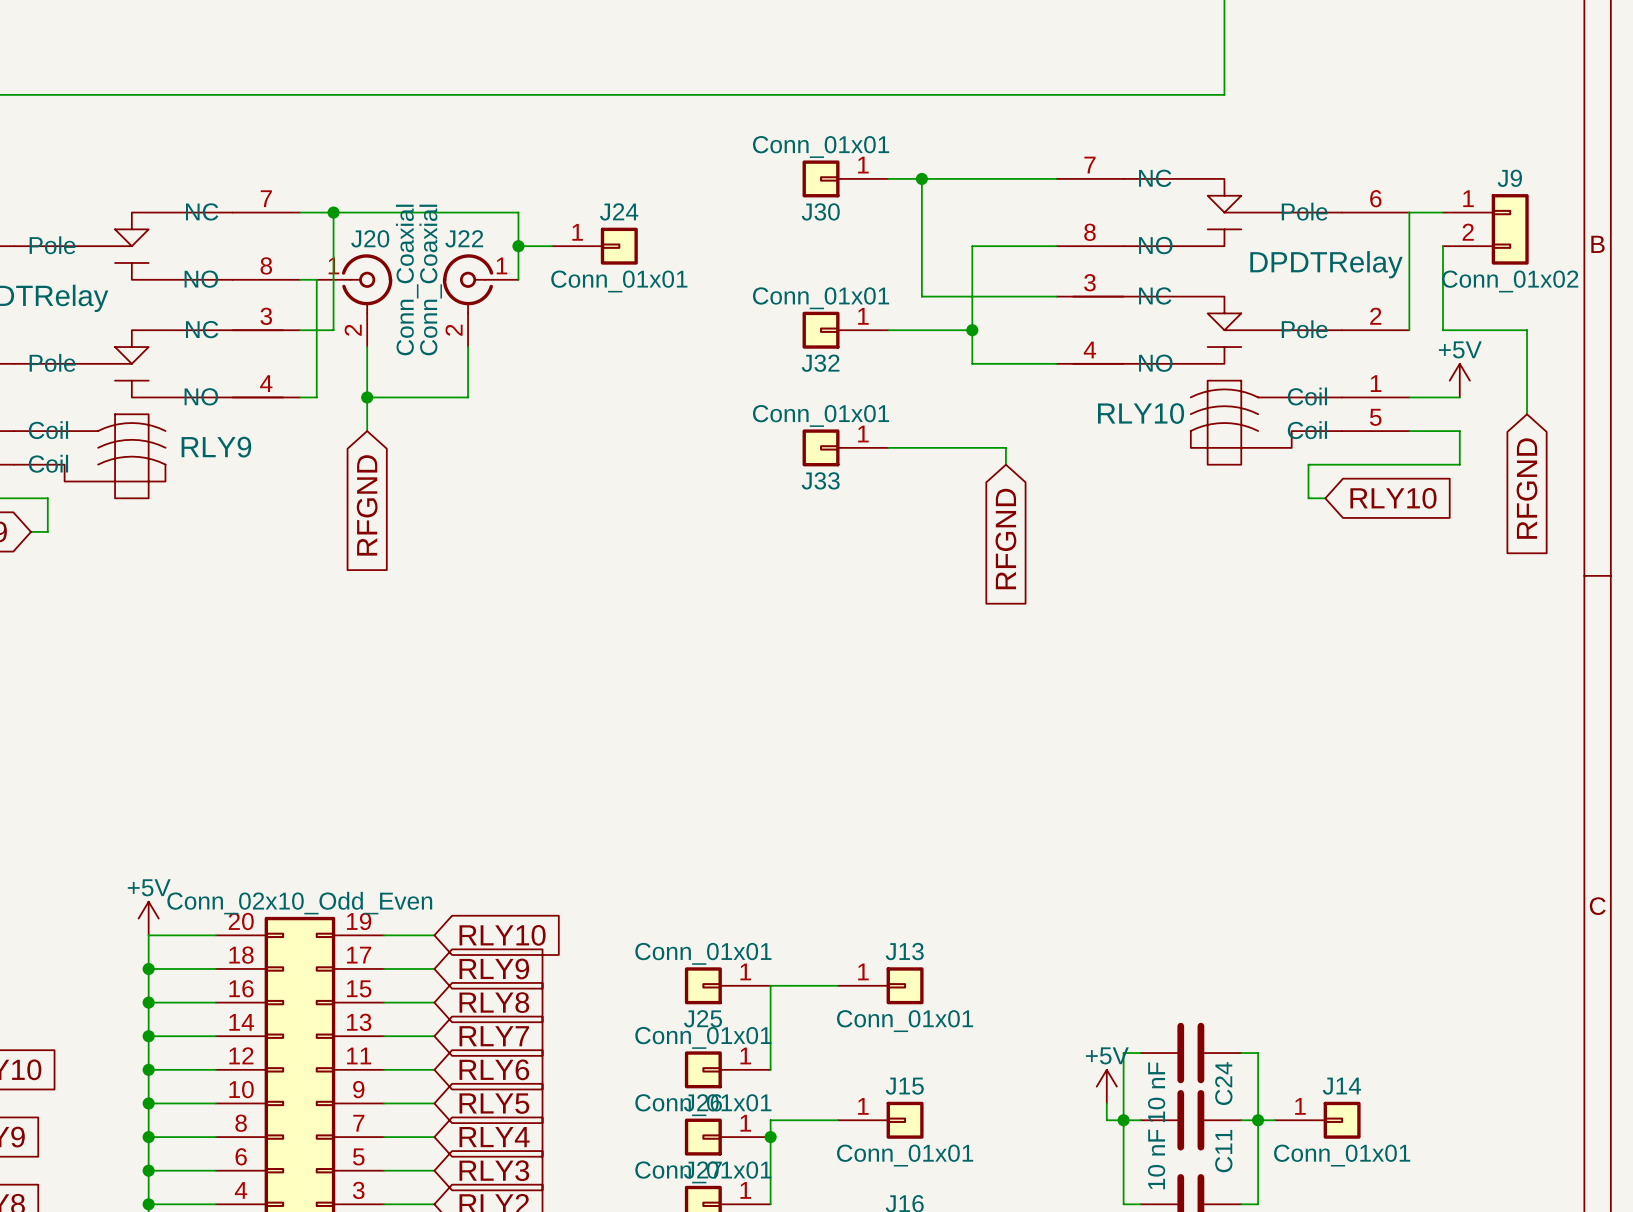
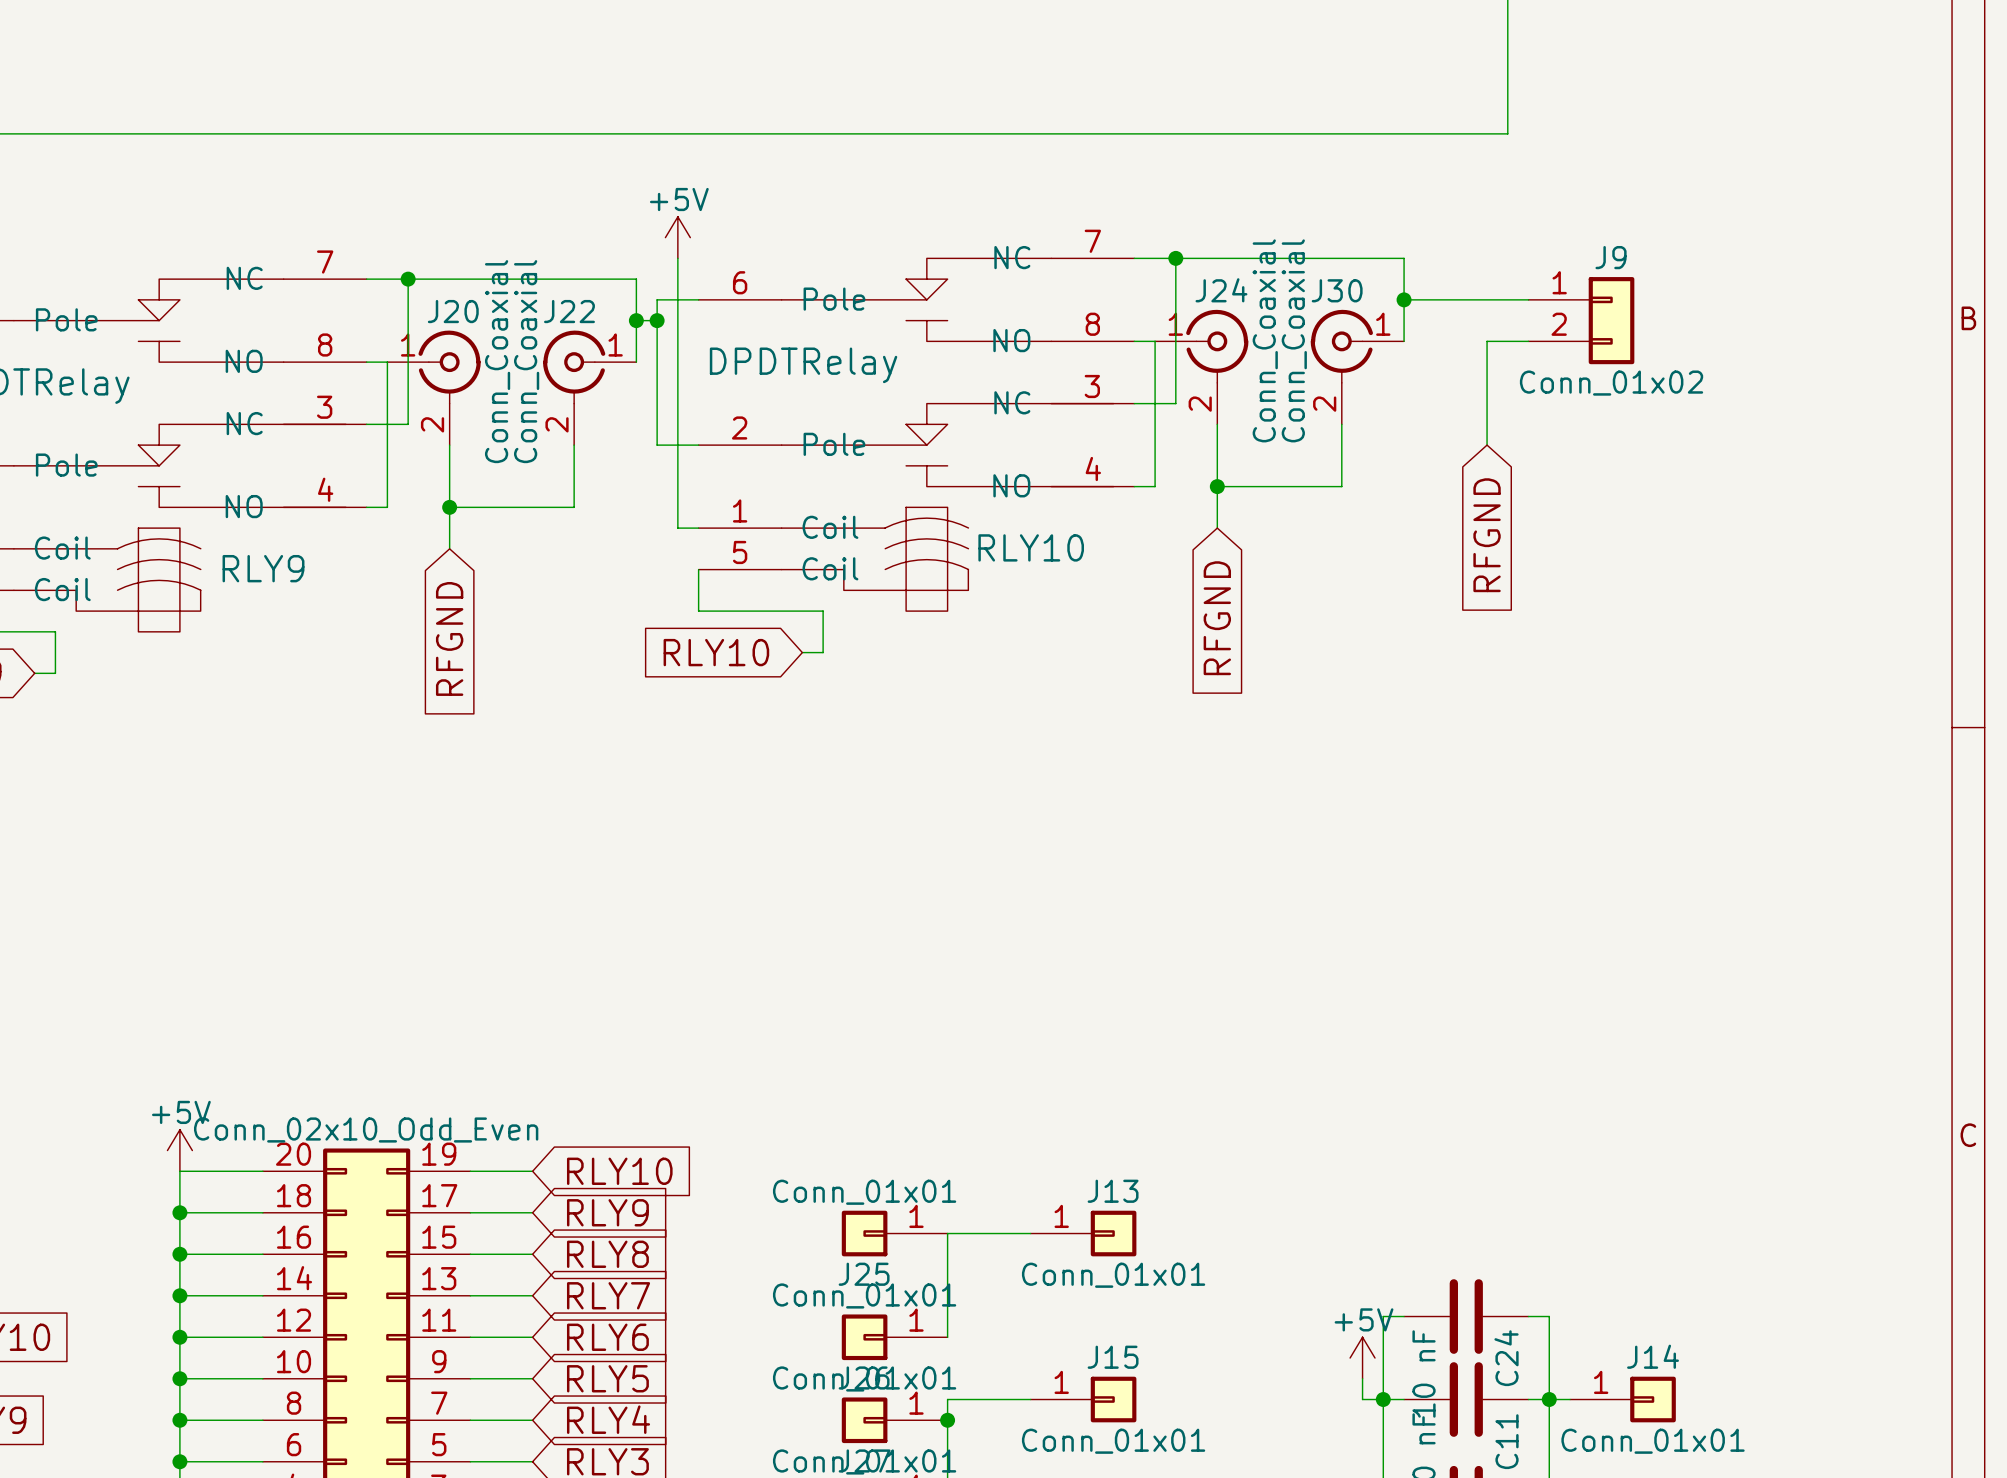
J30 value: Conn_01x01 (821, 146) -> Conn_Coaxial (1294, 340)
J30 symbol: [802, 160, 889, 198] -> [1310, 309, 1405, 425]
power symbol: none -> +5V (677, 237)
wire: (888, 178) (1056, 178) -> none
wire: (921, 178) (921, 296) (1056, 296) -> none
junction position: (921, 178) -> (1175, 258)
wire: none -> (677, 258) (677, 528) (698, 528)
wire: none -> (1134, 258) (1404, 258) (1404, 341)
wire: none -> (1175, 258) (1175, 403) (1134, 403)
J24 name position: J24 (619, 211) -> J24 (1221, 290)
J30 name position: J30 (820, 211) -> J30 (1337, 290)
wire: (1442, 212) (1409, 212) (1409, 330) -> none
J24 symbol: [552, 227, 638, 265] -> [1155, 309, 1249, 425]
wire: none -> (698, 299) (657, 299) (657, 445) (698, 445)
wire: none -> (1404, 299) (1528, 299)
junction: none -> (1404, 299)
J9 position: (1485, 229) -> (1581, 320)
wire: (535, 246) (552, 246) -> none
junction: none -> (657, 320)
wire: (1056, 246) (972, 246) (972, 363) (1056, 363) -> none
wire: (1442, 246) (1442, 330) (1527, 330) (1527, 414) -> none
wire: none -> (1134, 341) (1155, 341) (1155, 486) (1134, 486)
wire: none -> (1528, 341) (1487, 341) (1487, 445)
J24 value: Conn_01x01 (619, 281) -> Conn_Coaxial (1265, 340)
RLY10 flip: as is (1207, 321) -> left-right (947, 434)
RLY10 position: (1232, 321) -> (916, 434)
J32: Conn_01x01 (845, 330) -> none
wire: (888, 330) (972, 330) -> none
junction position: (972, 330) -> (1217, 486)
wire: none -> (1217, 424) (1217, 528)
wire: none -> (1341, 424) (1341, 486) (1217, 486)
power symbol: +5V (1459, 380) -> none
wire: (1409, 397) (1459, 397) -> none
global label: none -> RFGND (1487, 535)
wire: (1409, 431) (1459, 431) (1459, 464) (1308, 464) (1308, 498) (1325, 498) -> none
wire: none -> (698, 569) (698, 611) (823, 611) (823, 652) (802, 652)
J33: Conn_01x01 (845, 447) -> none
wire: (888, 447) (1005, 447) (1005, 464) -> none
global label: RFGND (1527, 488) -> none
global label: RLY10 (1393, 498) -> none
global label: none -> RLY10 (716, 652)
global label position: RFGND (1005, 539) -> RFGND (1217, 618)

